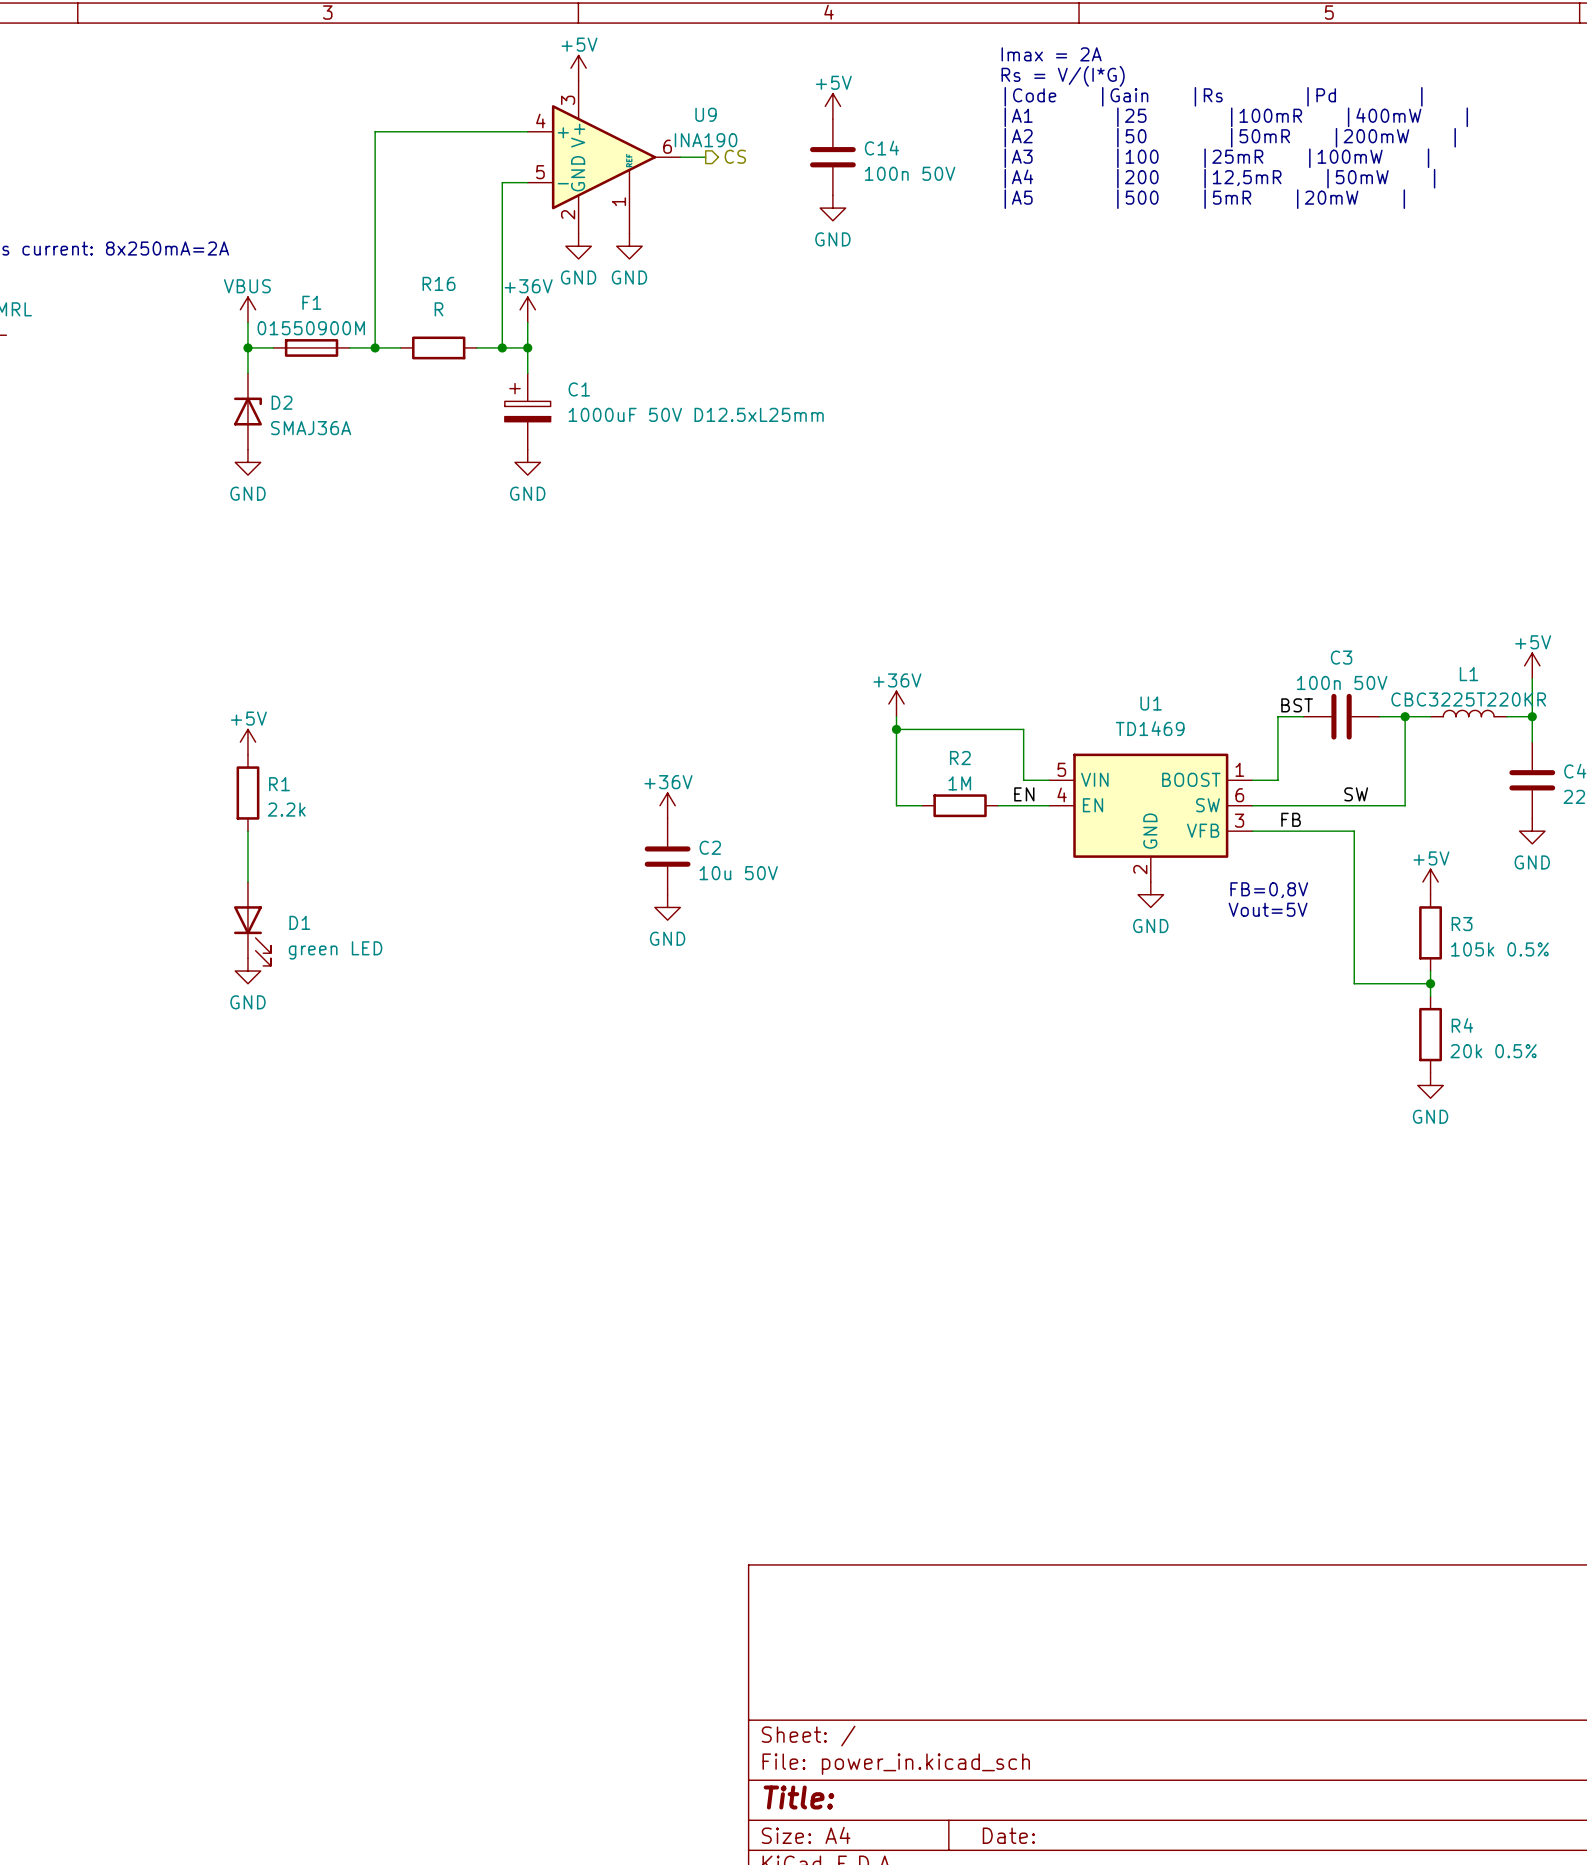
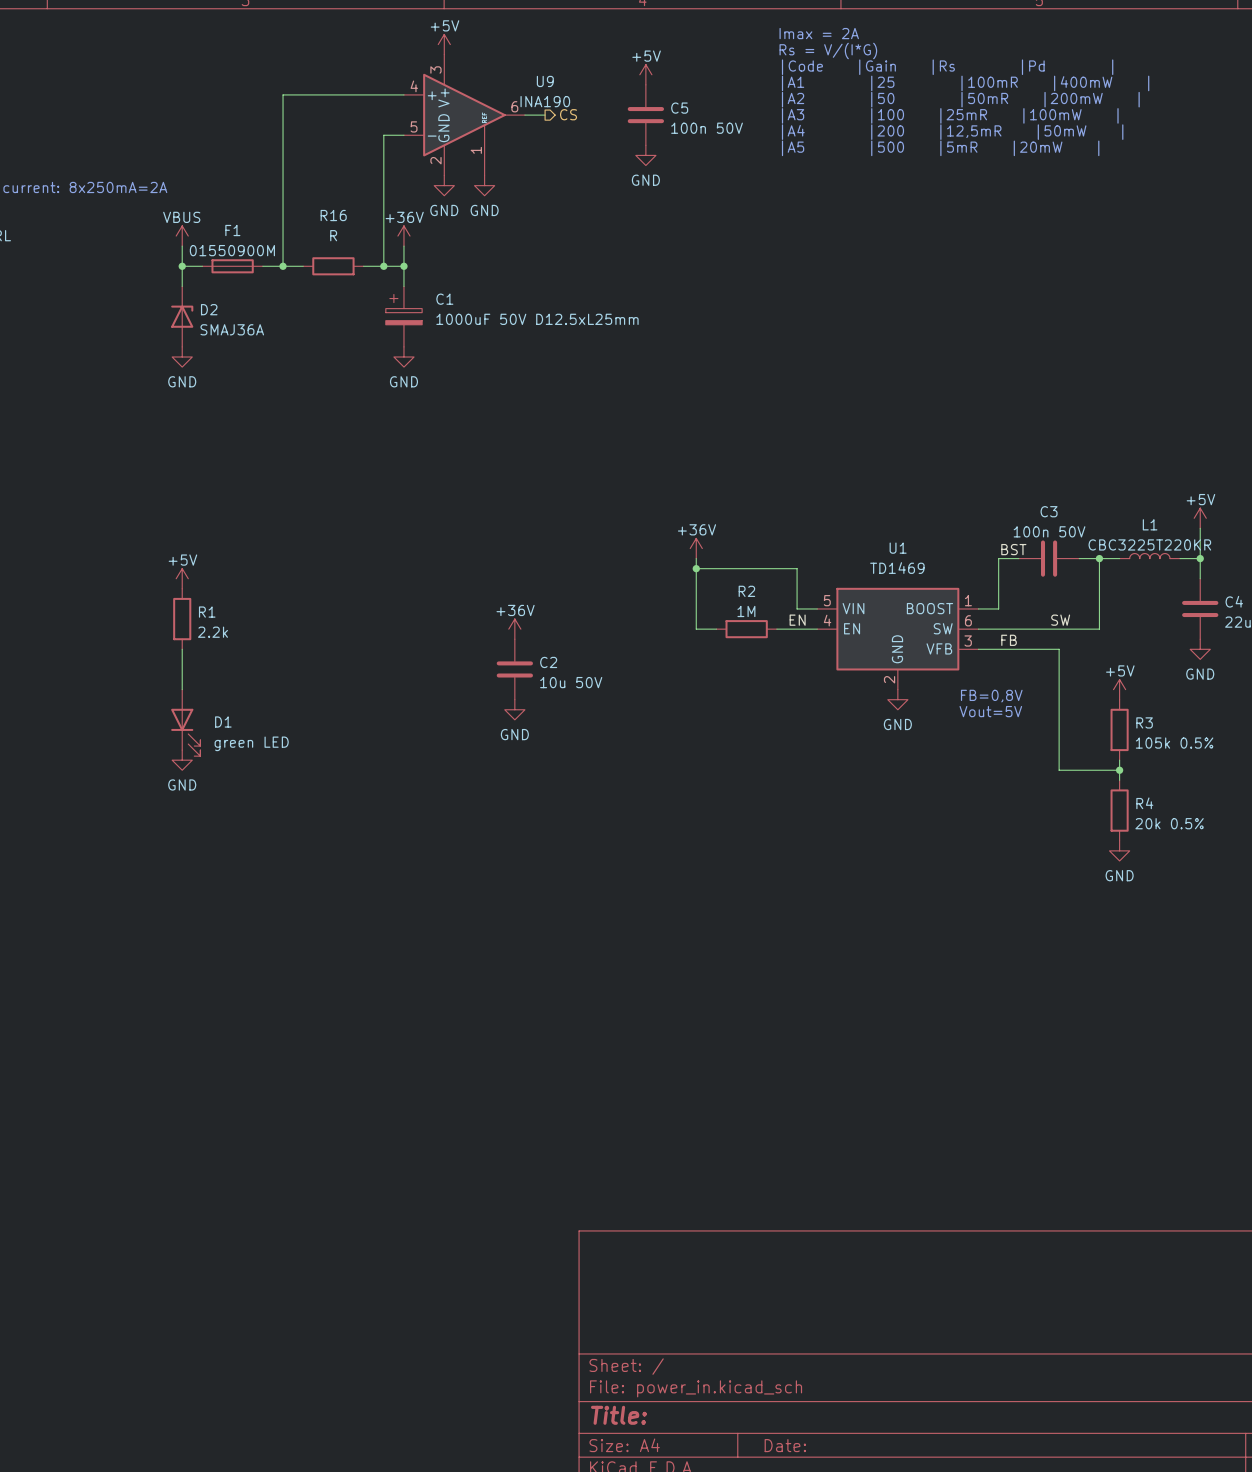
C14 name: C14 (881, 148) -> C5 (679, 108)

